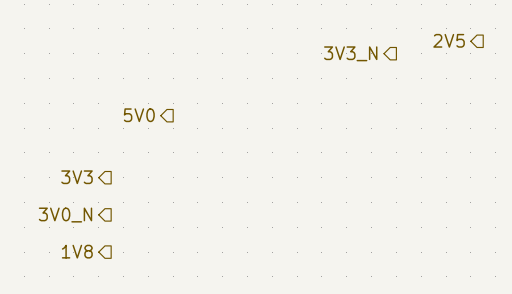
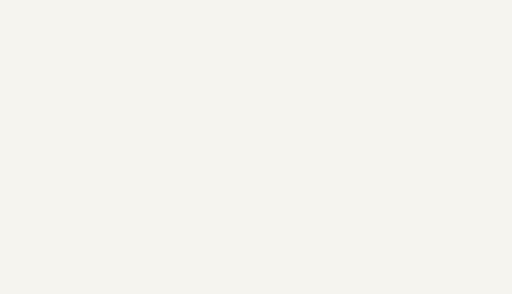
hierarchical label: 2V5 (449, 40) -> none
hierarchical label: 3V3_N (350, 53) -> none
hierarchical label: 5V0 (139, 115) -> none
hierarchical label: 3V3 (77, 177) -> none
hierarchical label: 3V0_N (65, 215) -> none
hierarchical label: 1V8 (77, 251) -> none

